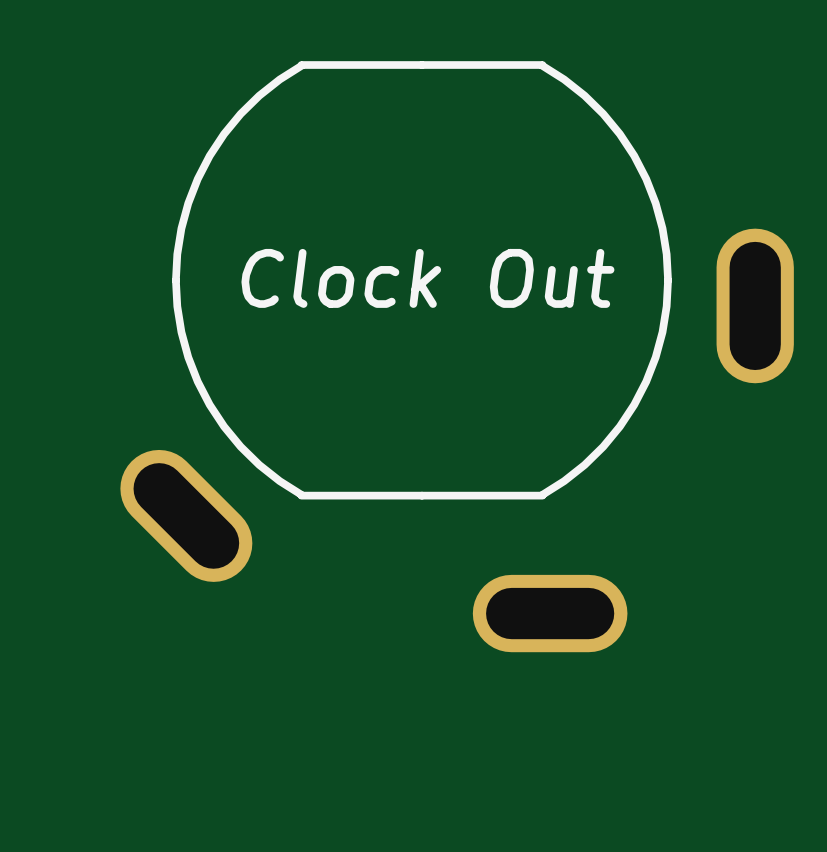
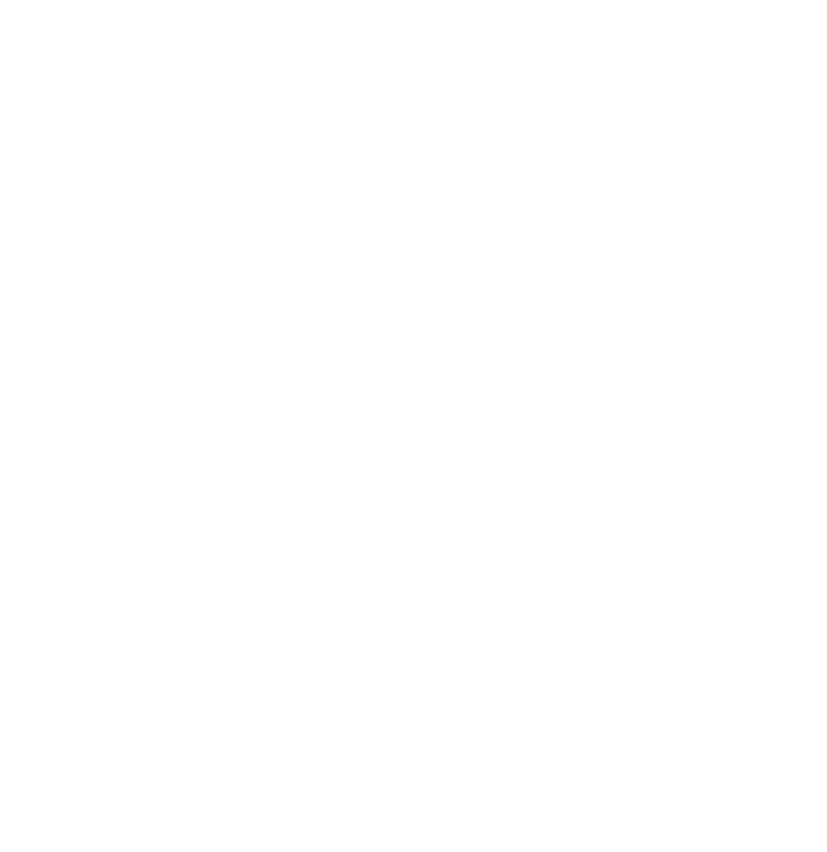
part: (457, 356) -> none

